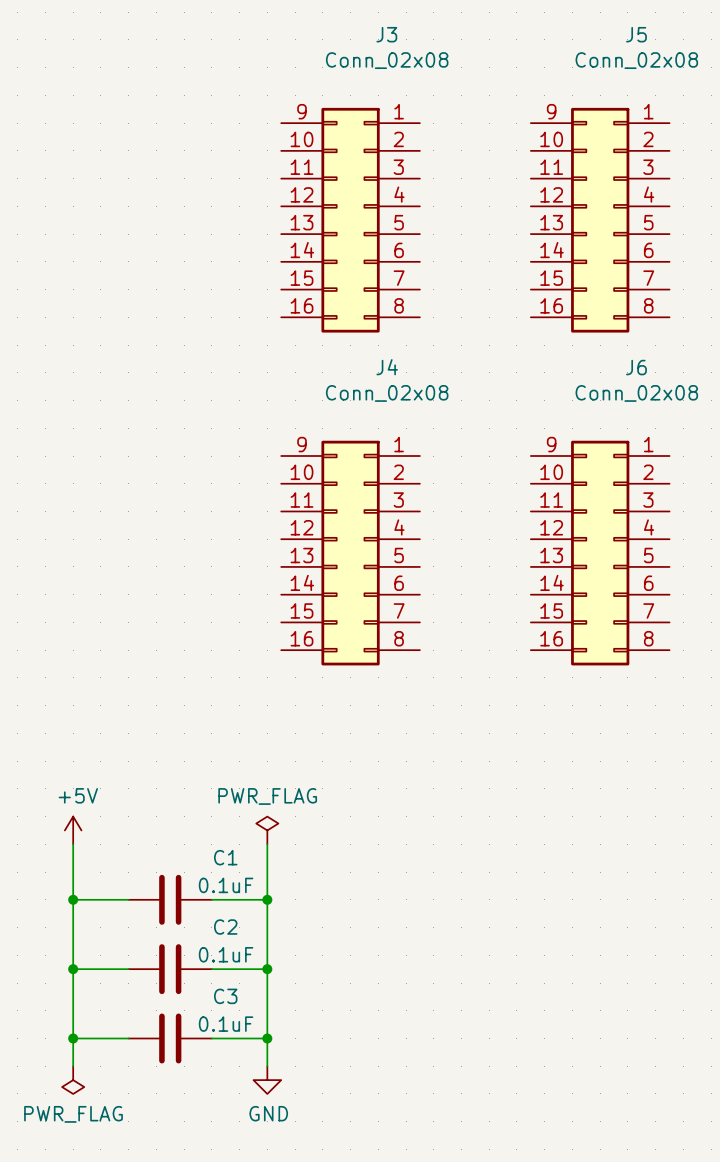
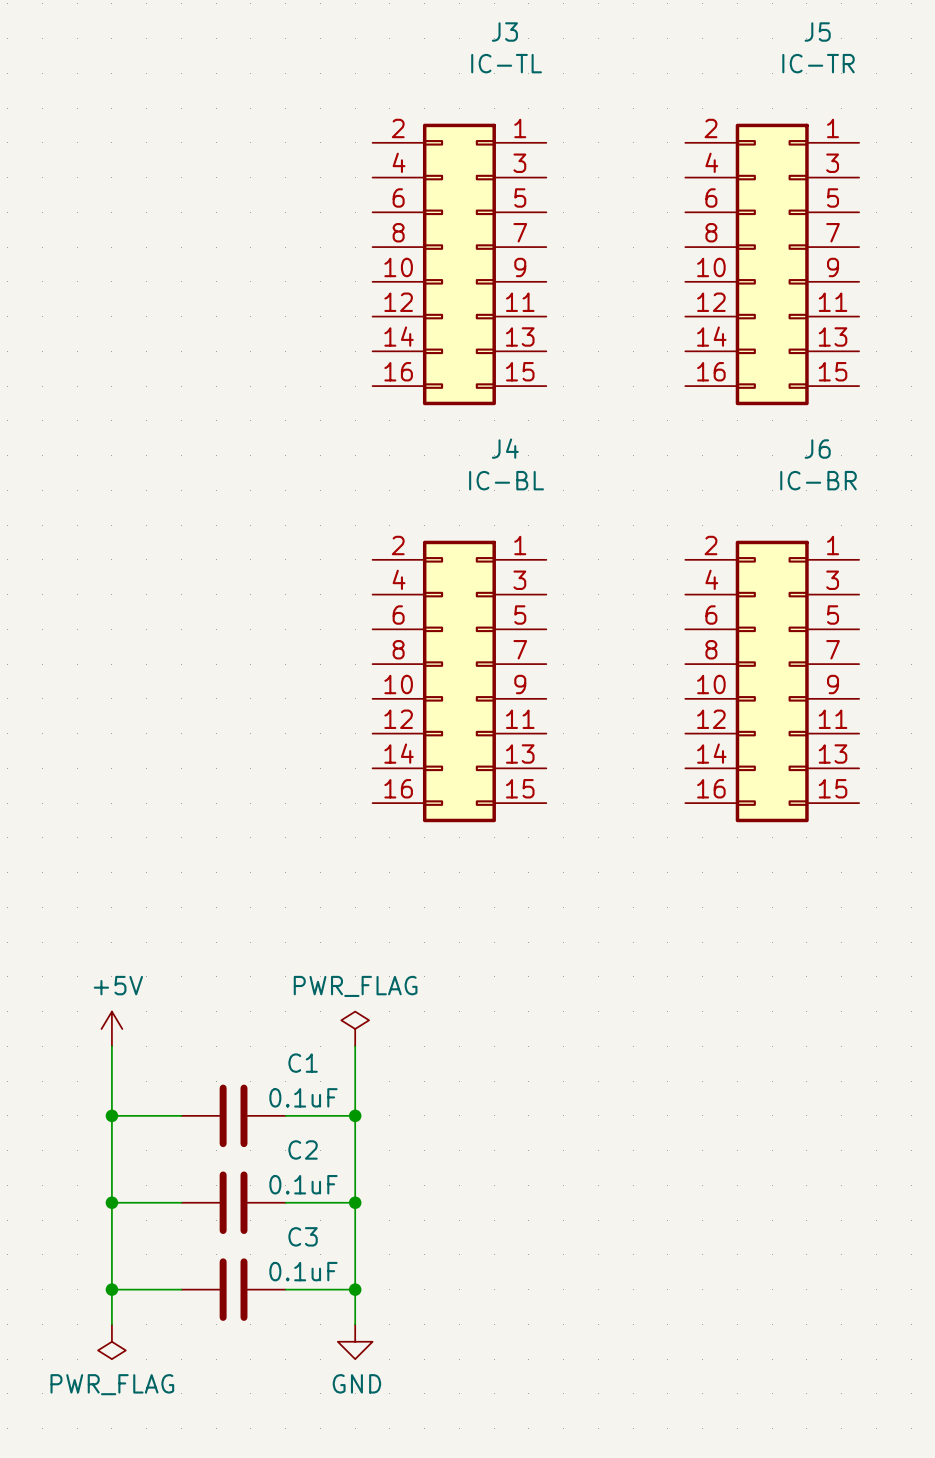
J3 value: Conn_02x08 (387, 60) -> IC-TL (506, 63)
J5 value: Conn_02x08 (636, 60) -> IC-TR (818, 63)
J3 symbol: [281, 107, 420, 333] -> [372, 123, 547, 406]
J5 symbol: [530, 107, 670, 333] -> [685, 123, 860, 406]
J4 value: Conn_02x08 (387, 393) -> IC-BL (506, 480)
J6 value: Conn_02x08 (636, 393) -> IC-BR (818, 480)
J4 symbol: [281, 440, 420, 666] -> [372, 540, 547, 823]
J6 symbol: [530, 440, 670, 666] -> [685, 540, 860, 823]

